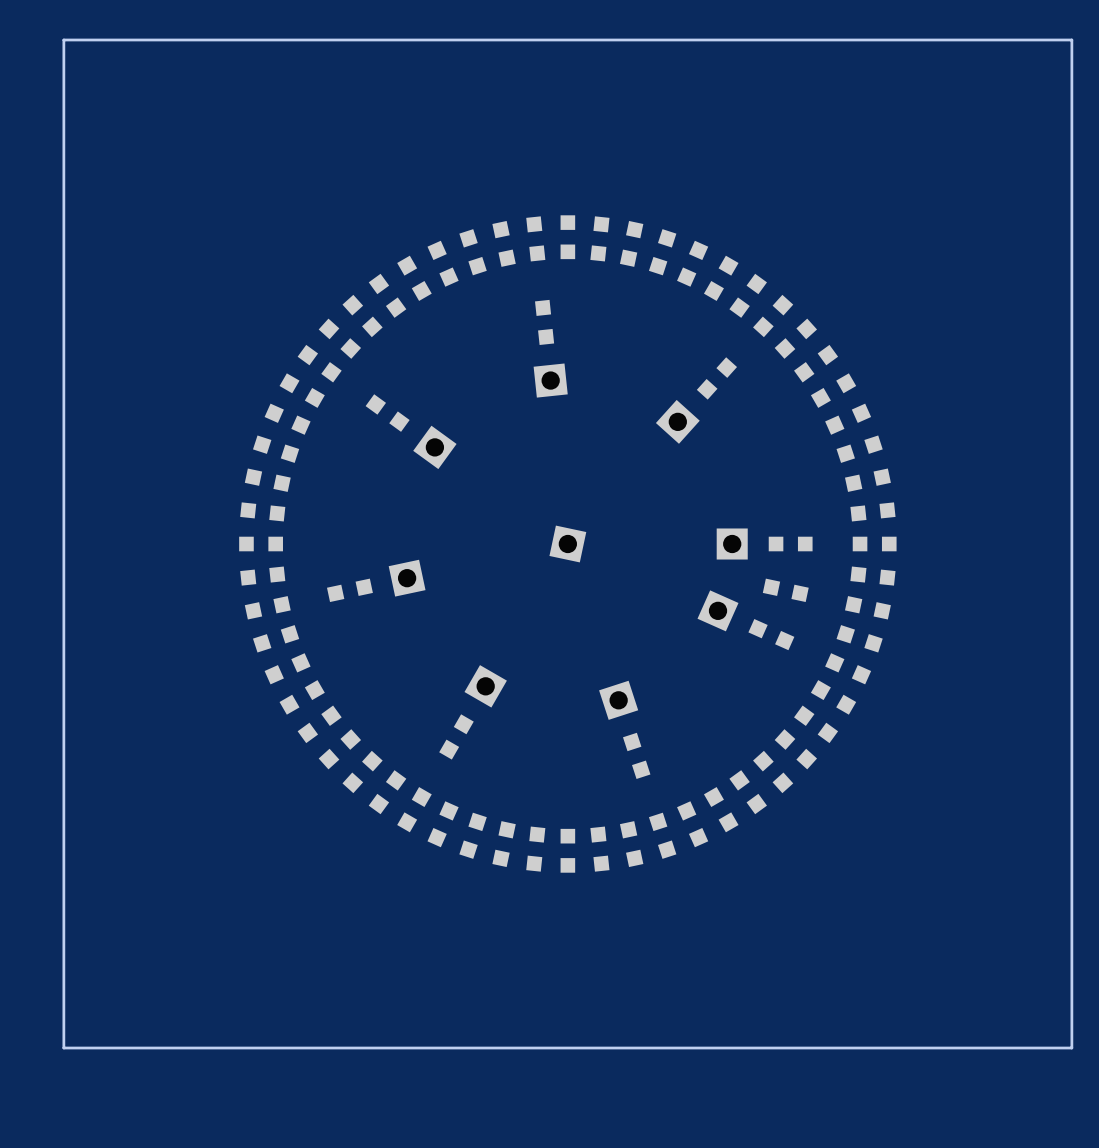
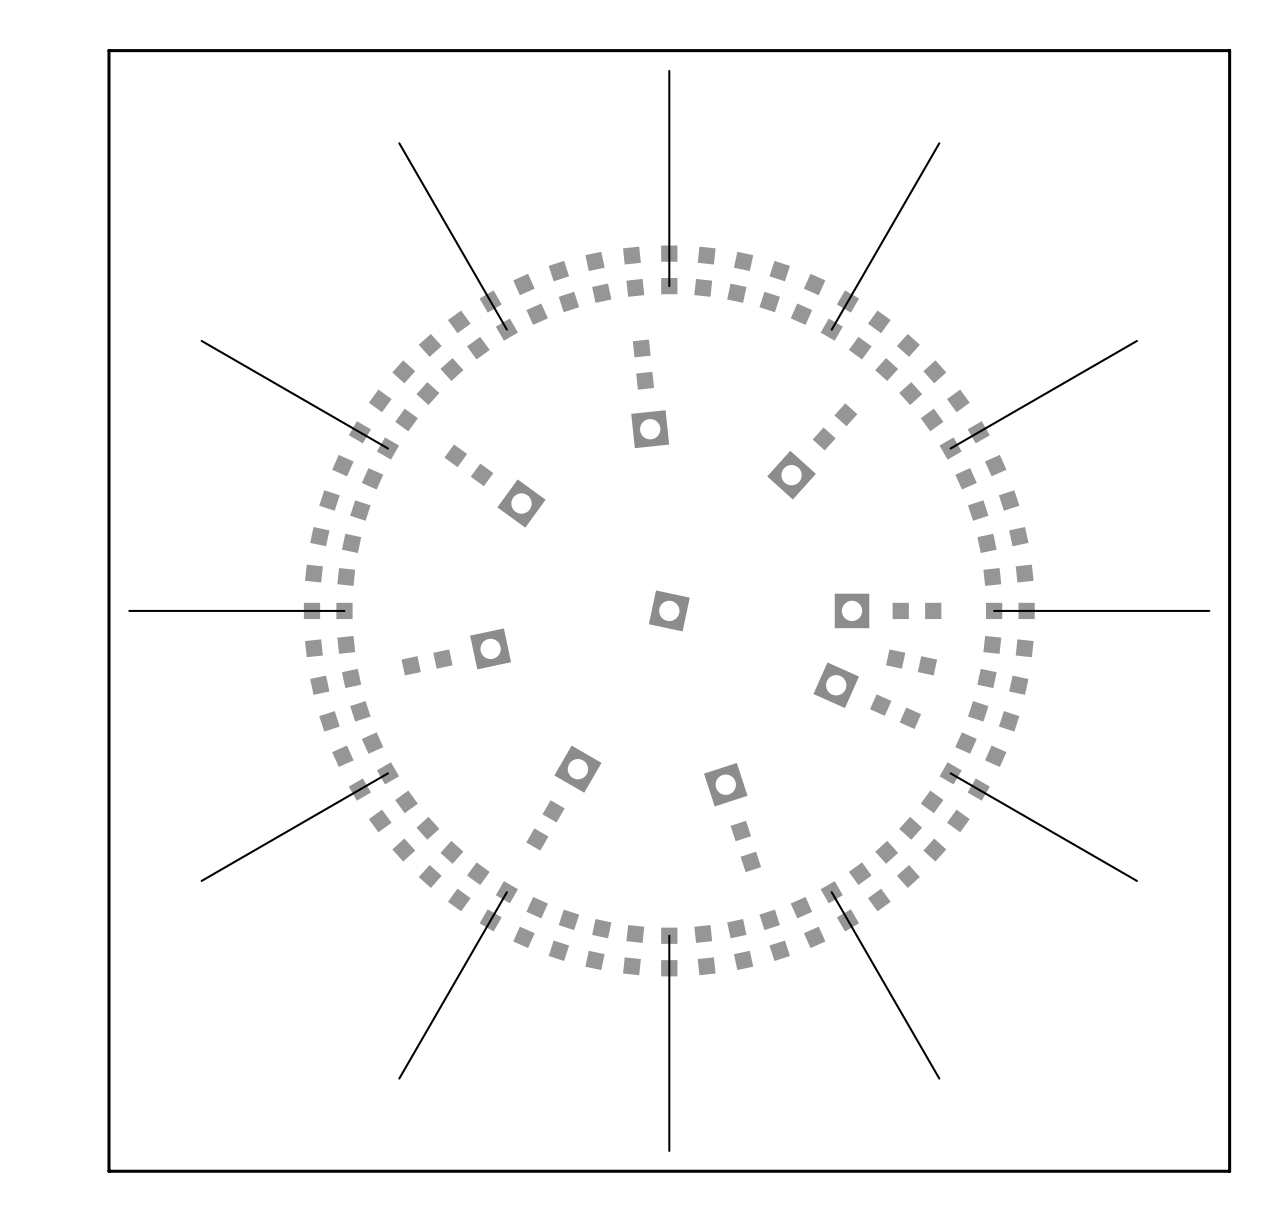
line: none -> (669, 70) (669, 286)
line: none -> (399, 143) (506, 329)
line: none -> (939, 143) (831, 329)
line: none -> (201, 340) (388, 448)
line: none -> (1136, 340) (950, 448)
line: none -> (129, 610) (344, 610)
line: none -> (994, 610) (1209, 610)
line: none -> (388, 773) (201, 880)
line: none -> (950, 773) (1136, 880)
line: none -> (506, 892) (399, 1078)
line: none -> (831, 892) (939, 1078)
line: none -> (669, 935) (669, 1150)

